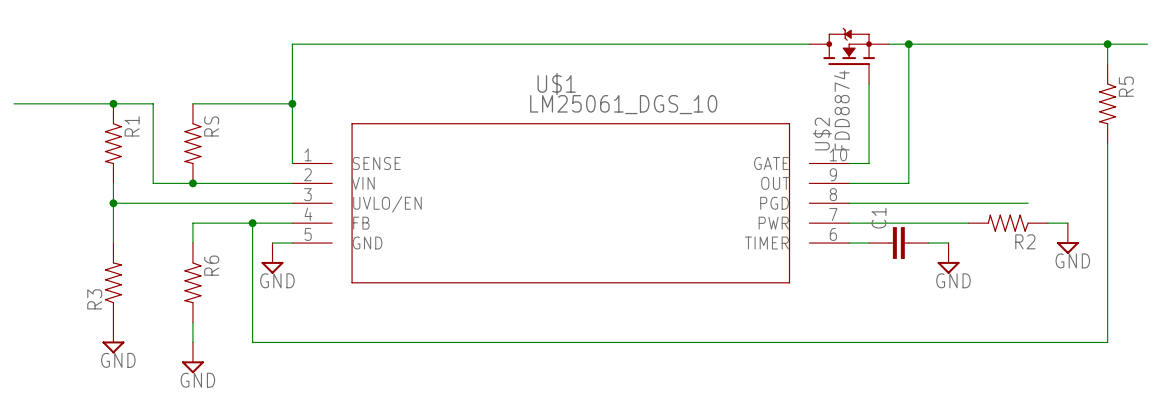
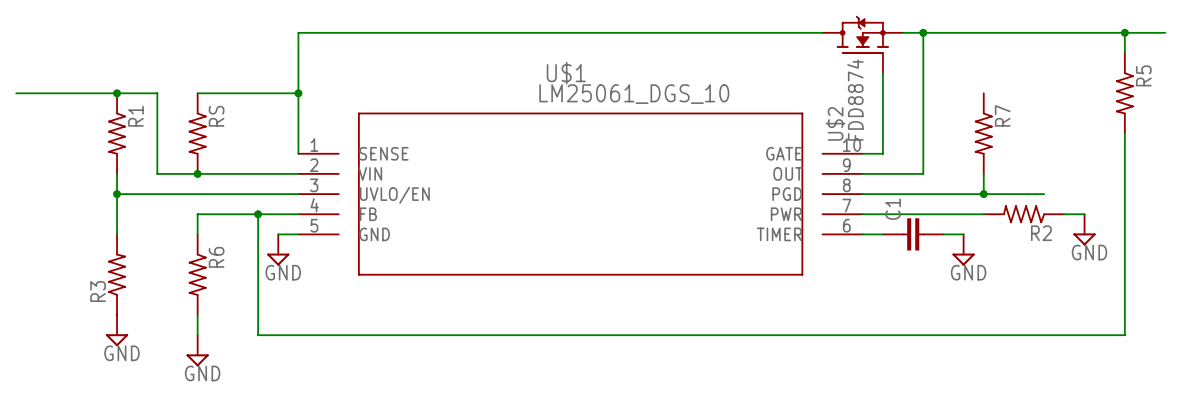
R7: none -> (983, 133)
wire: none -> (983, 173) (983, 194)
junction: none -> (983, 194)

